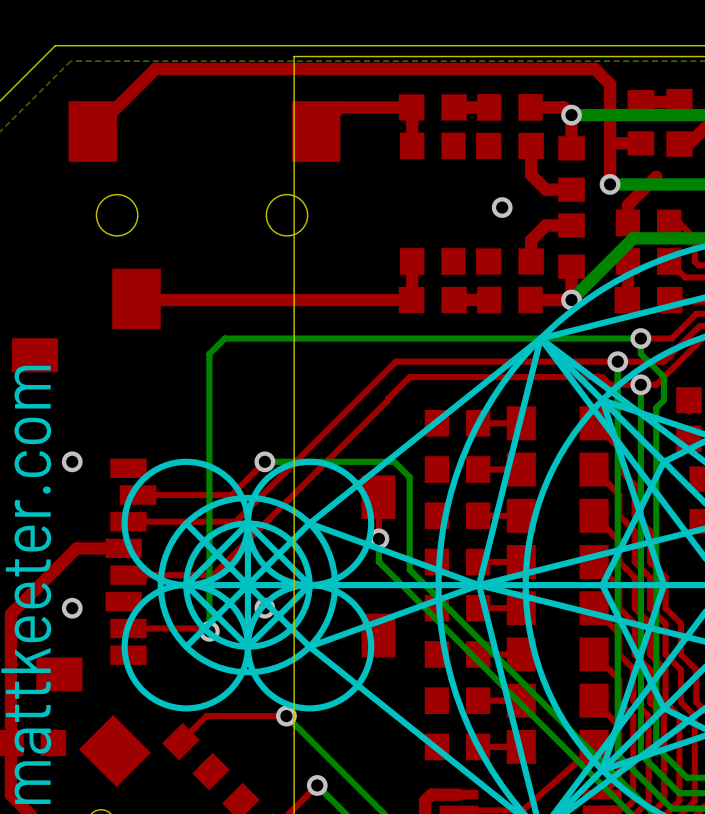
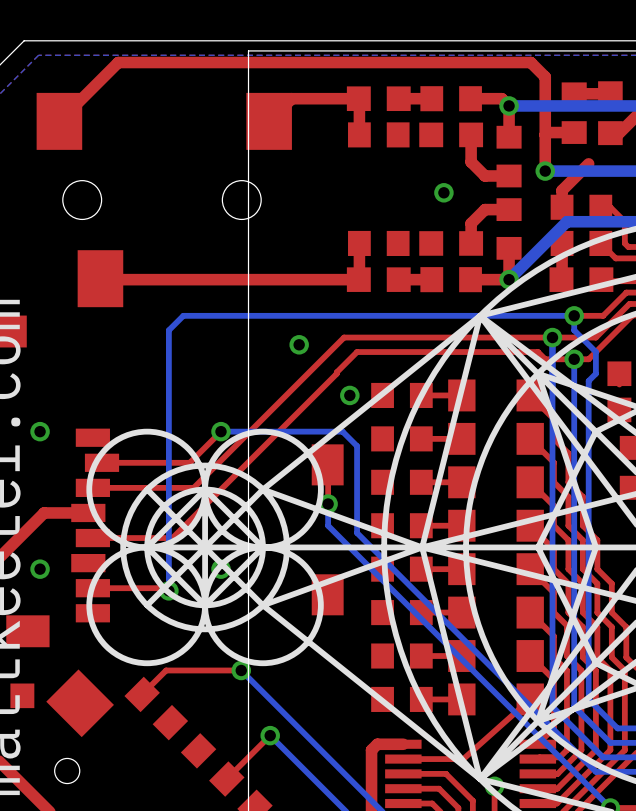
via: none -> (299, 344)
via: none -> (349, 395)

